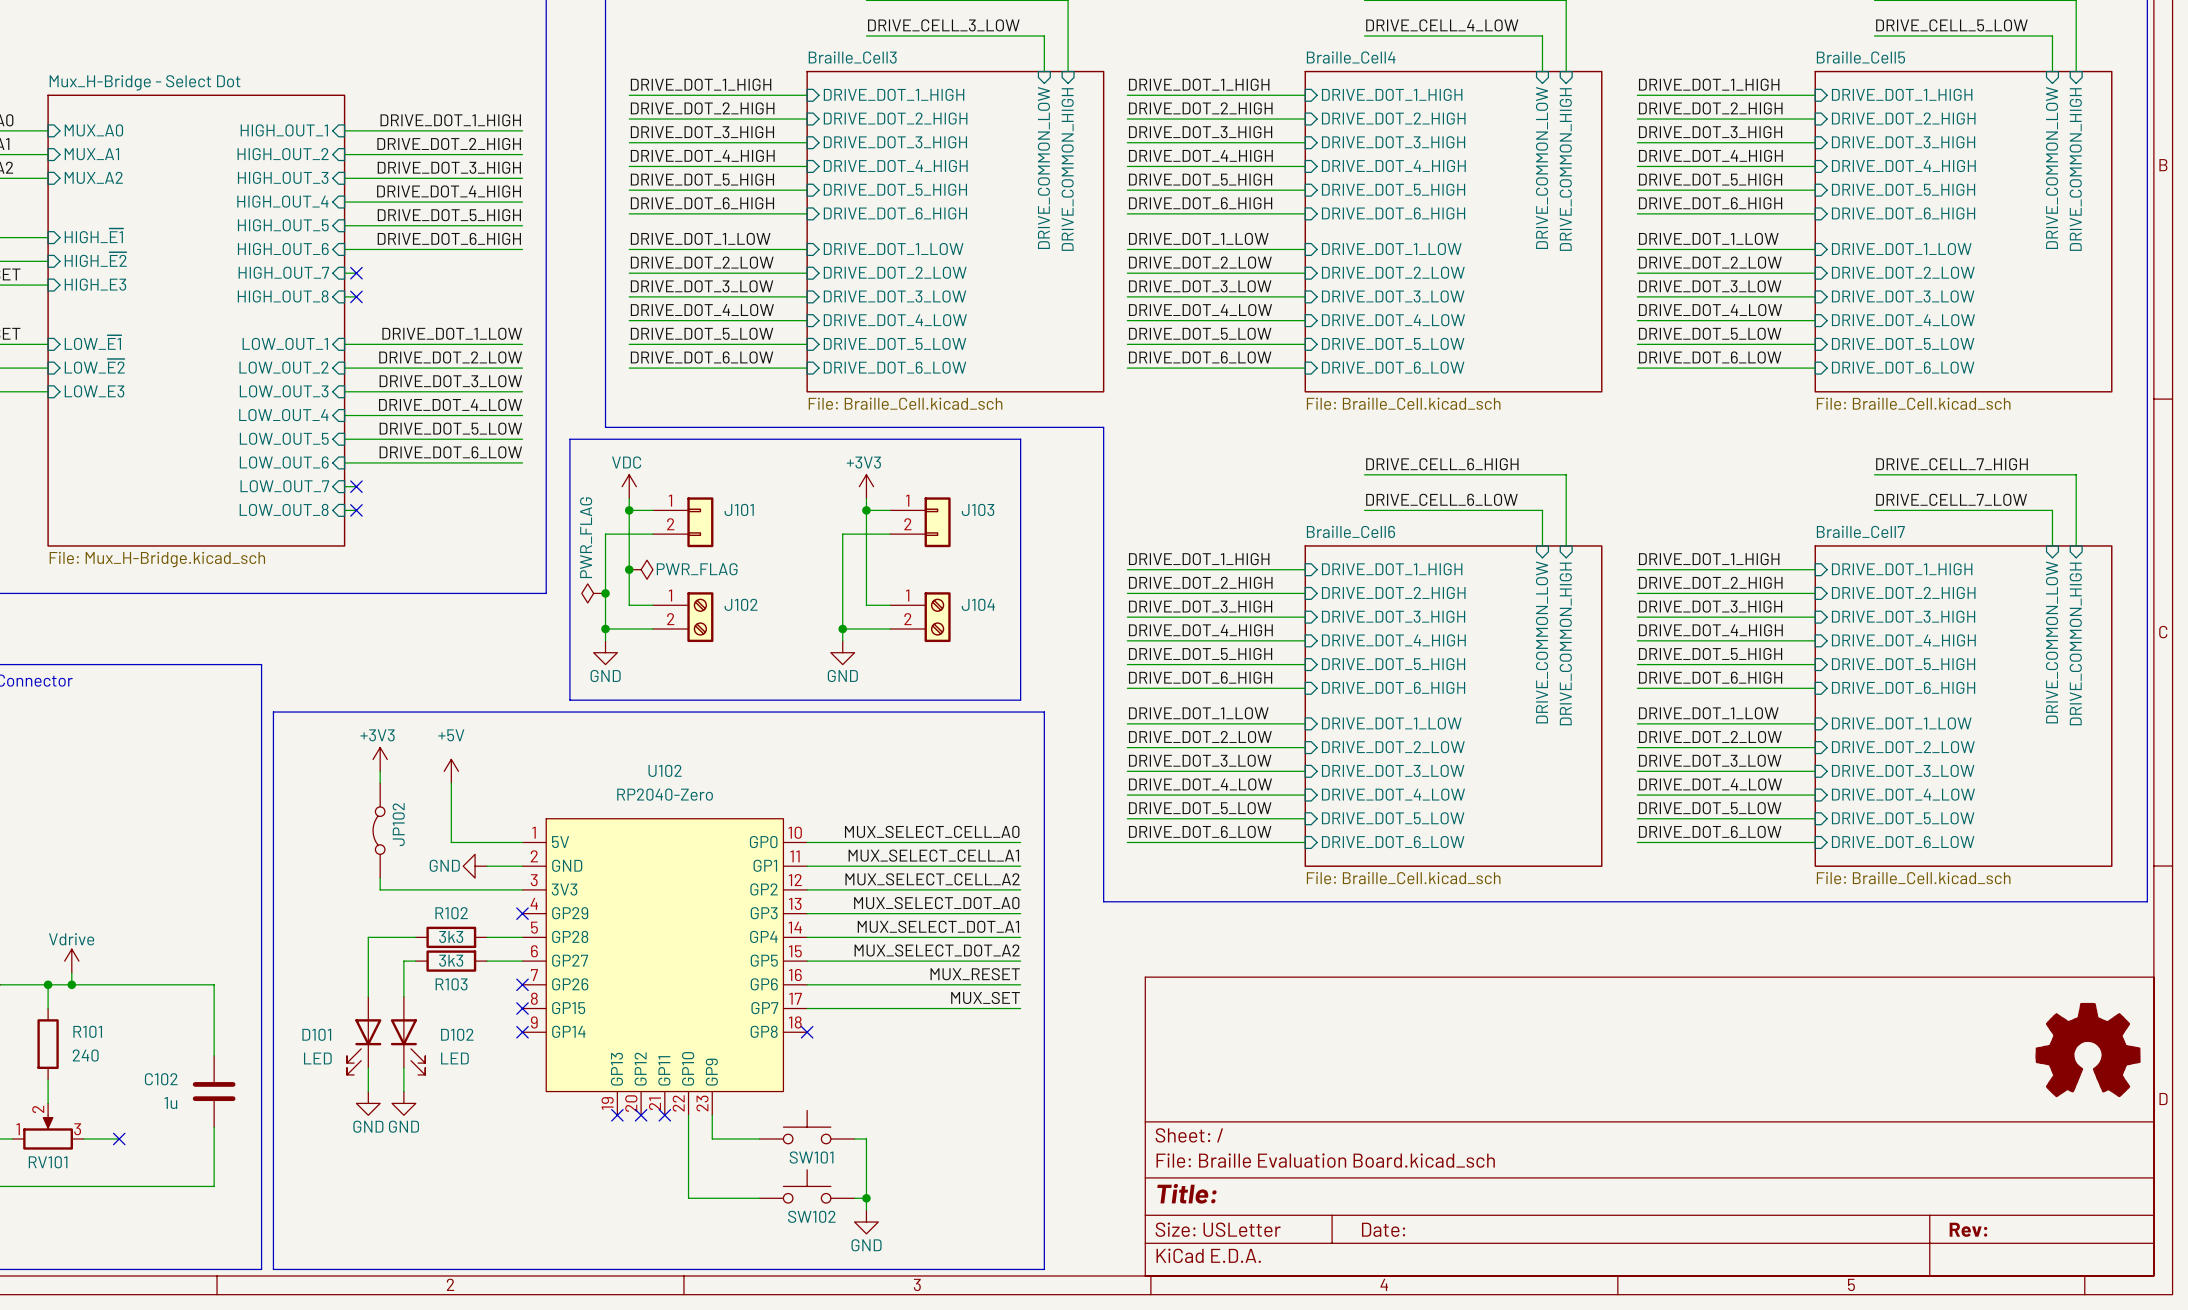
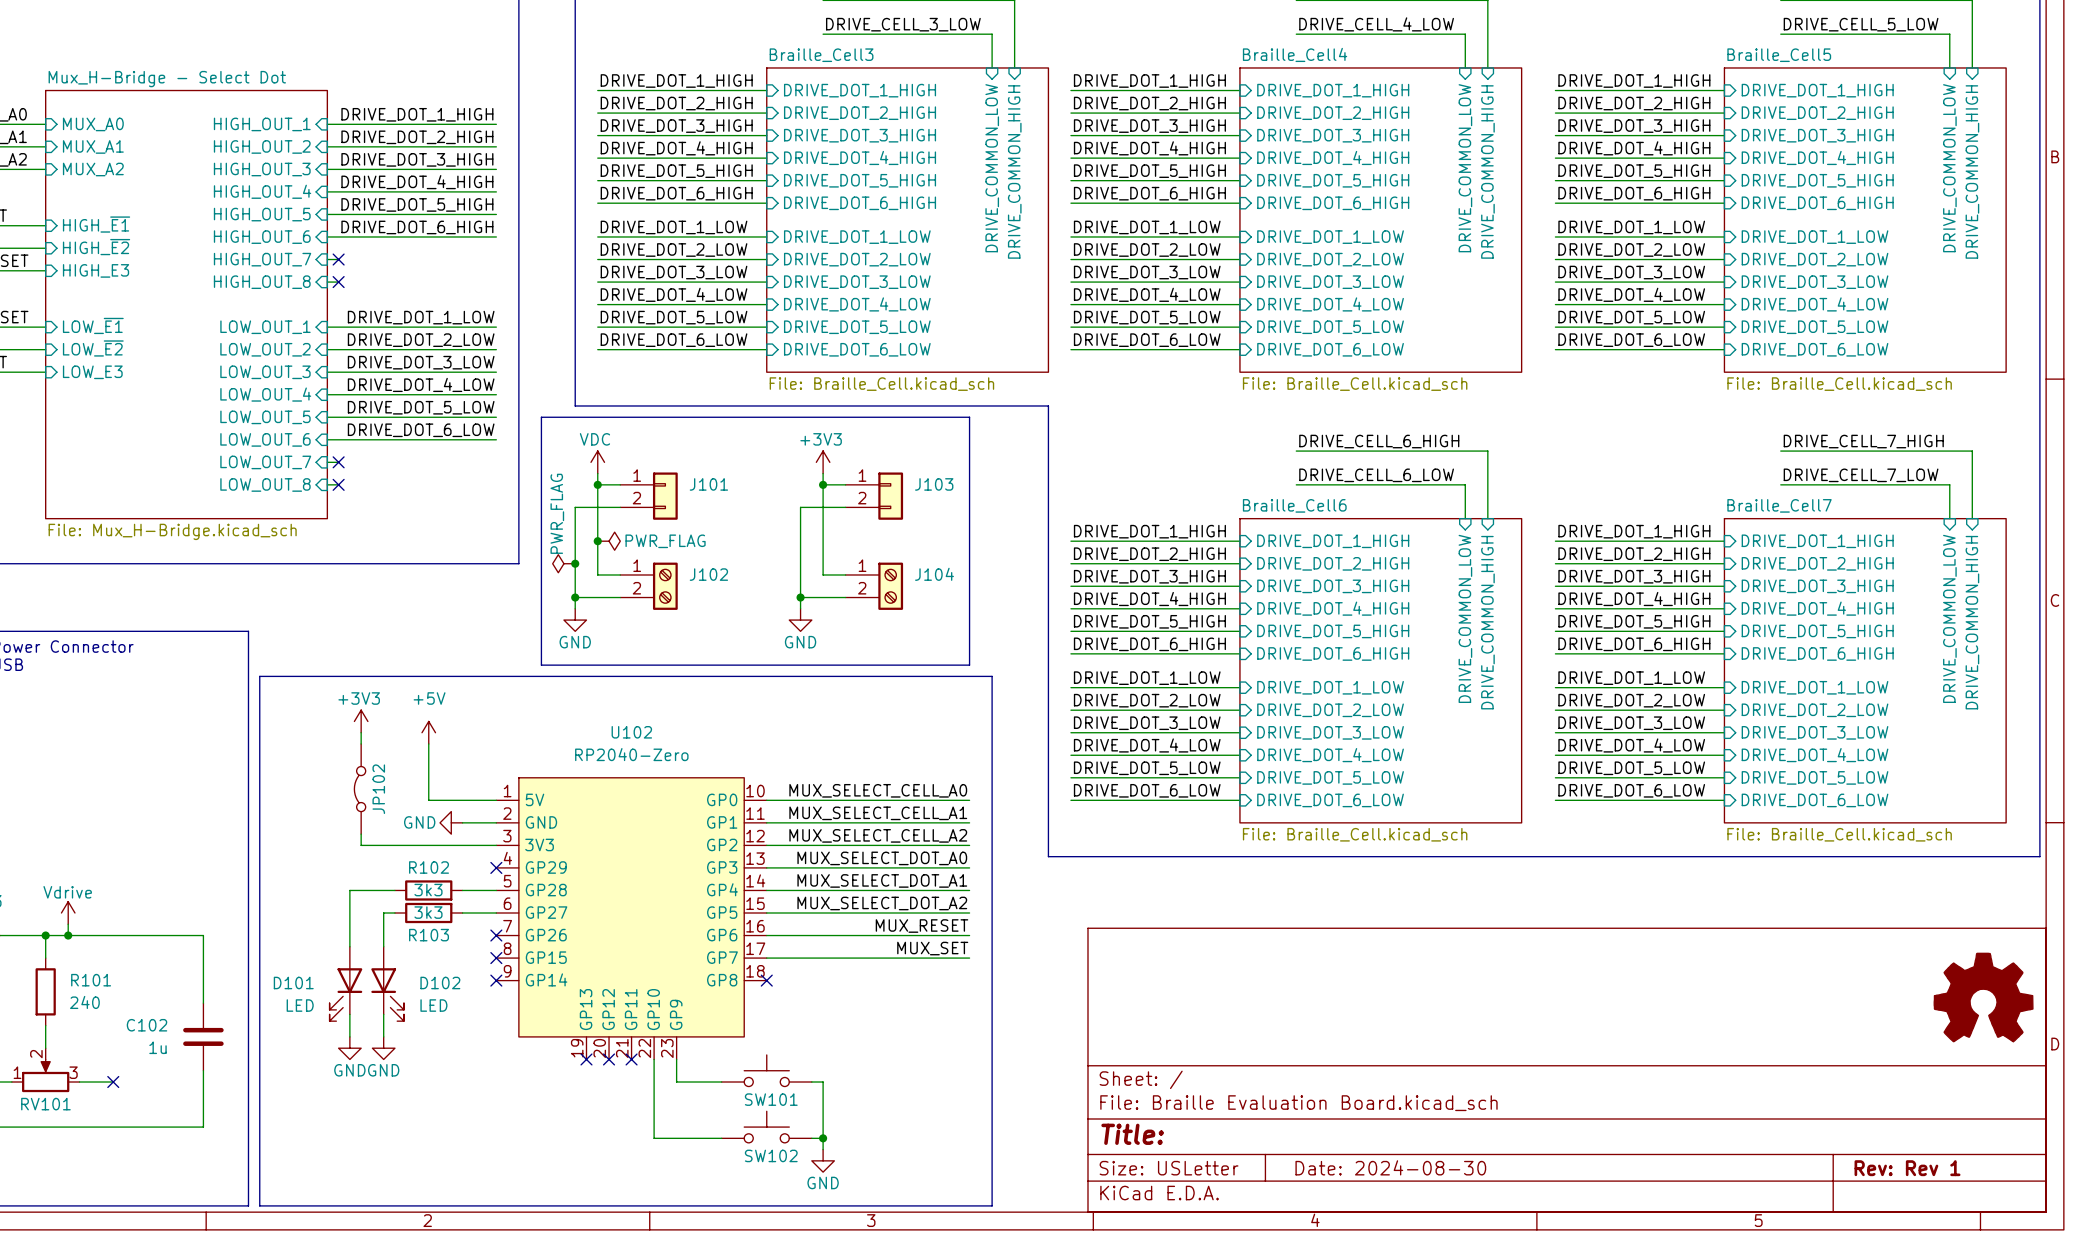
title block: Date: (1383, 1229) -> Date: 2024-08-30 (1390, 1167)
title block: Rev: (1968, 1229) -> Rev: Rev 1 (1907, 1168)

